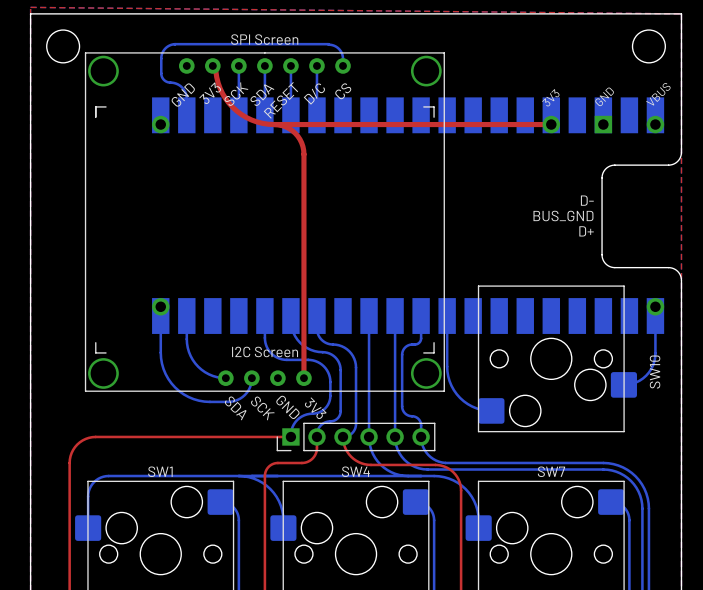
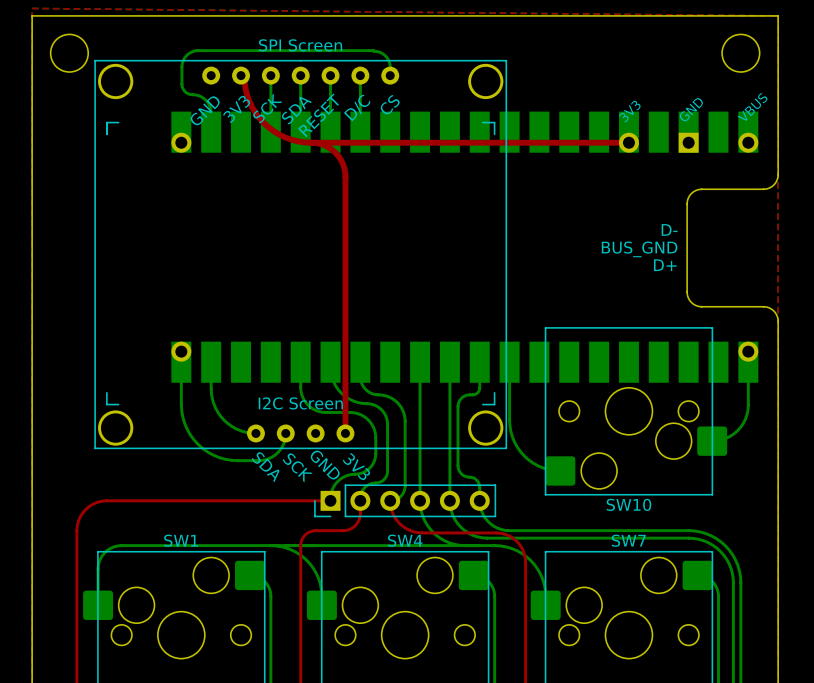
SW10 name rotation: 0° (655, 372) -> 90° clockwise (628, 504)
SW10 name position: SW10 (655, 372) -> SW10 (628, 504)

